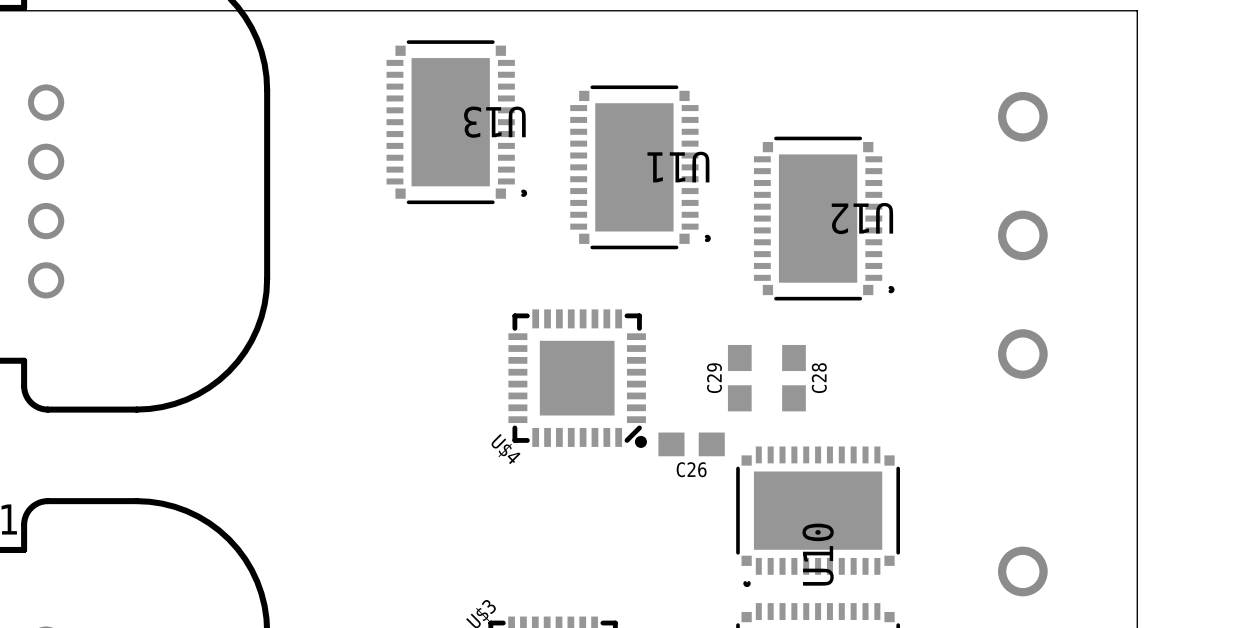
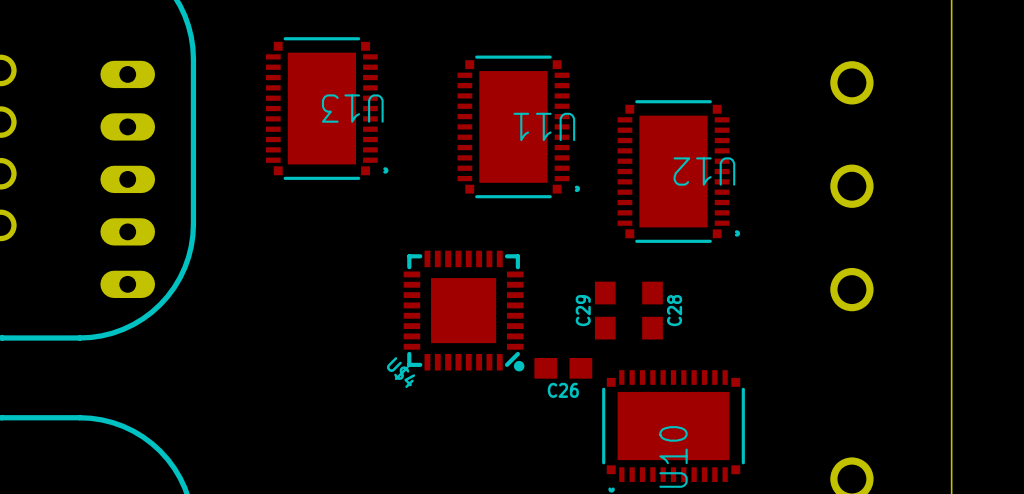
U13 position: (456, 122) -> (327, 108)
part: none -> (127, 179)

